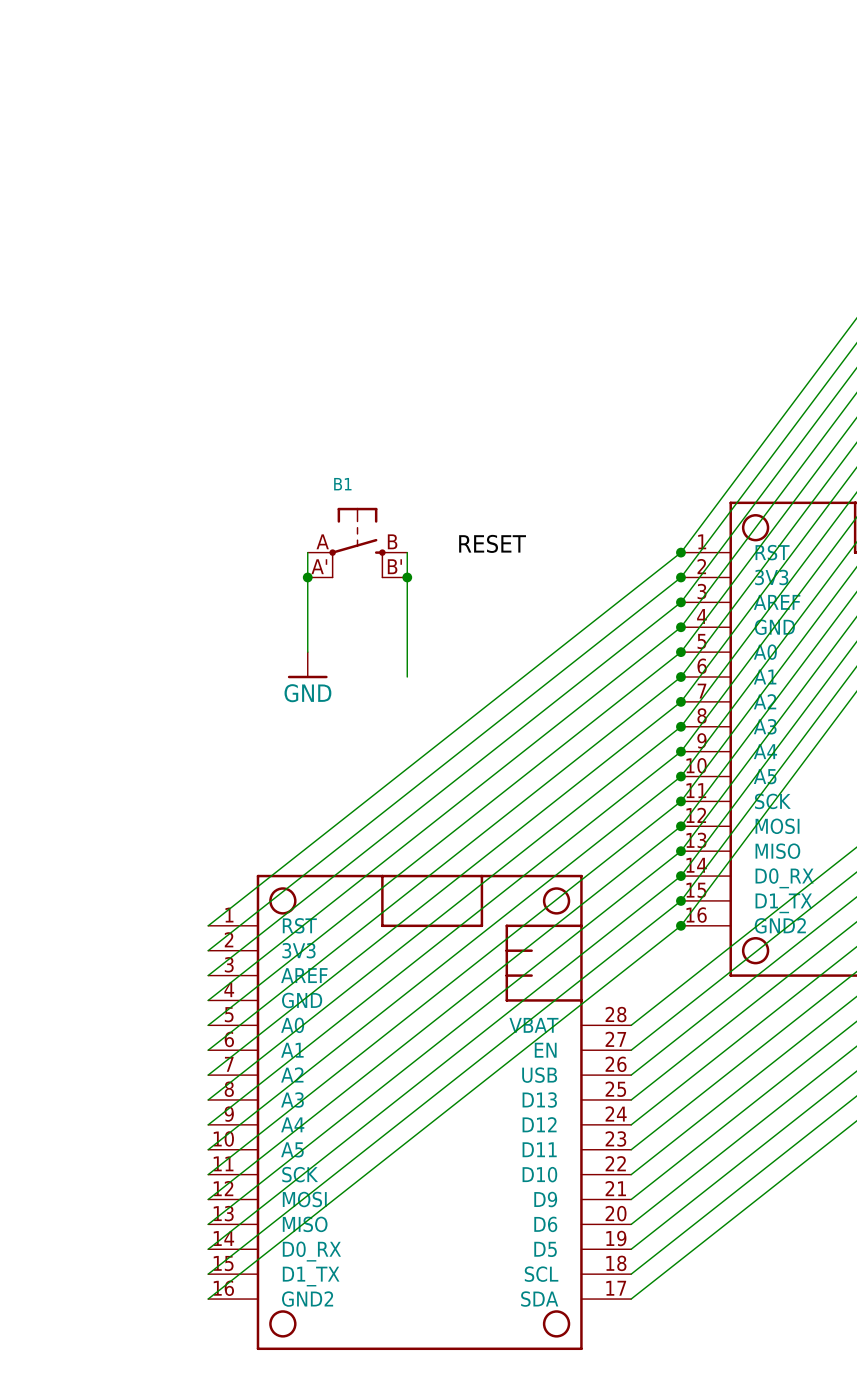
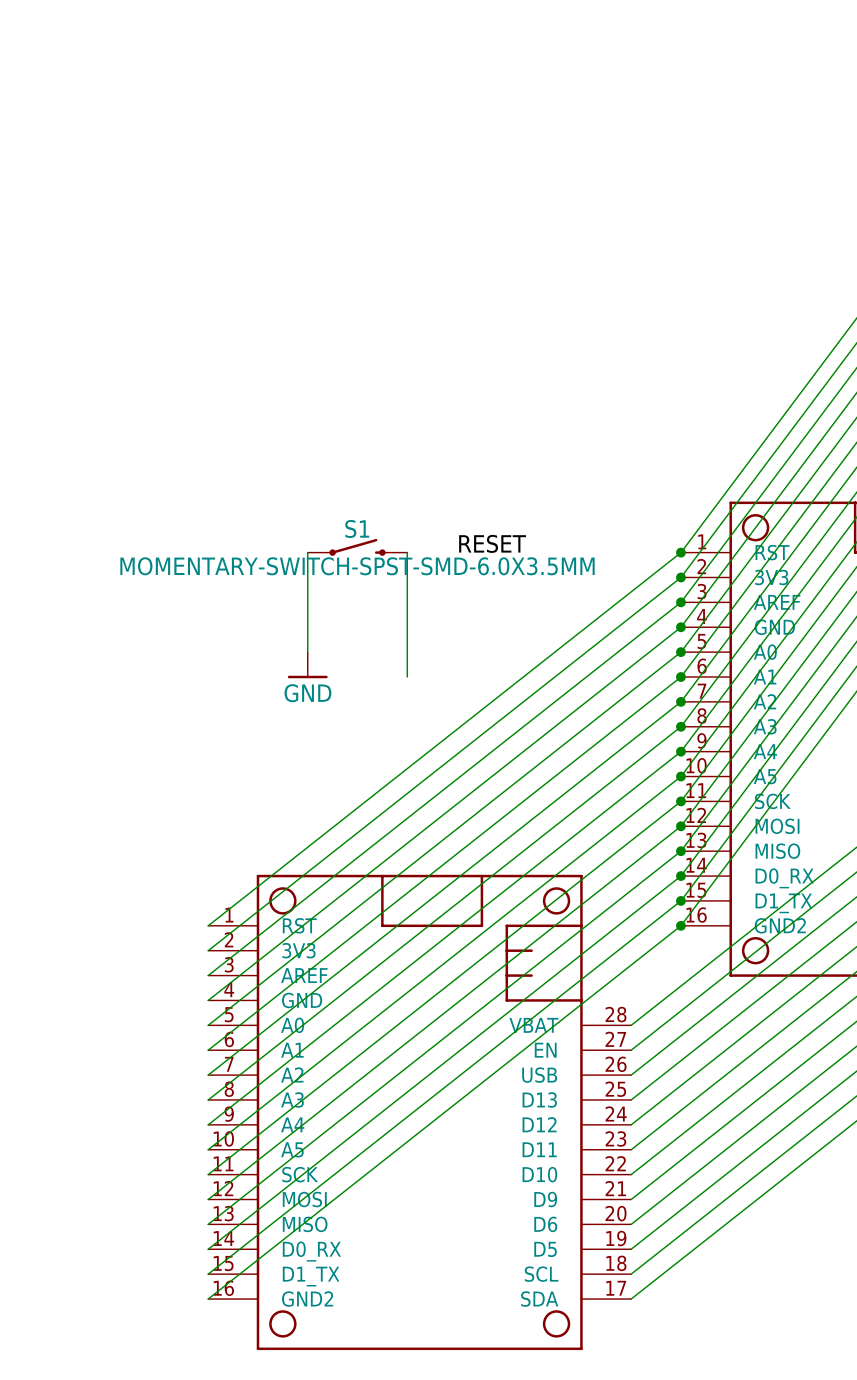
B1: (357, 543) -> none
S1: none -> MOMENTARY-SWITCH-SPST-SMD-6.0X3.5MM (357, 547)
junction: (307, 577) -> none
junction: (407, 577) -> none

